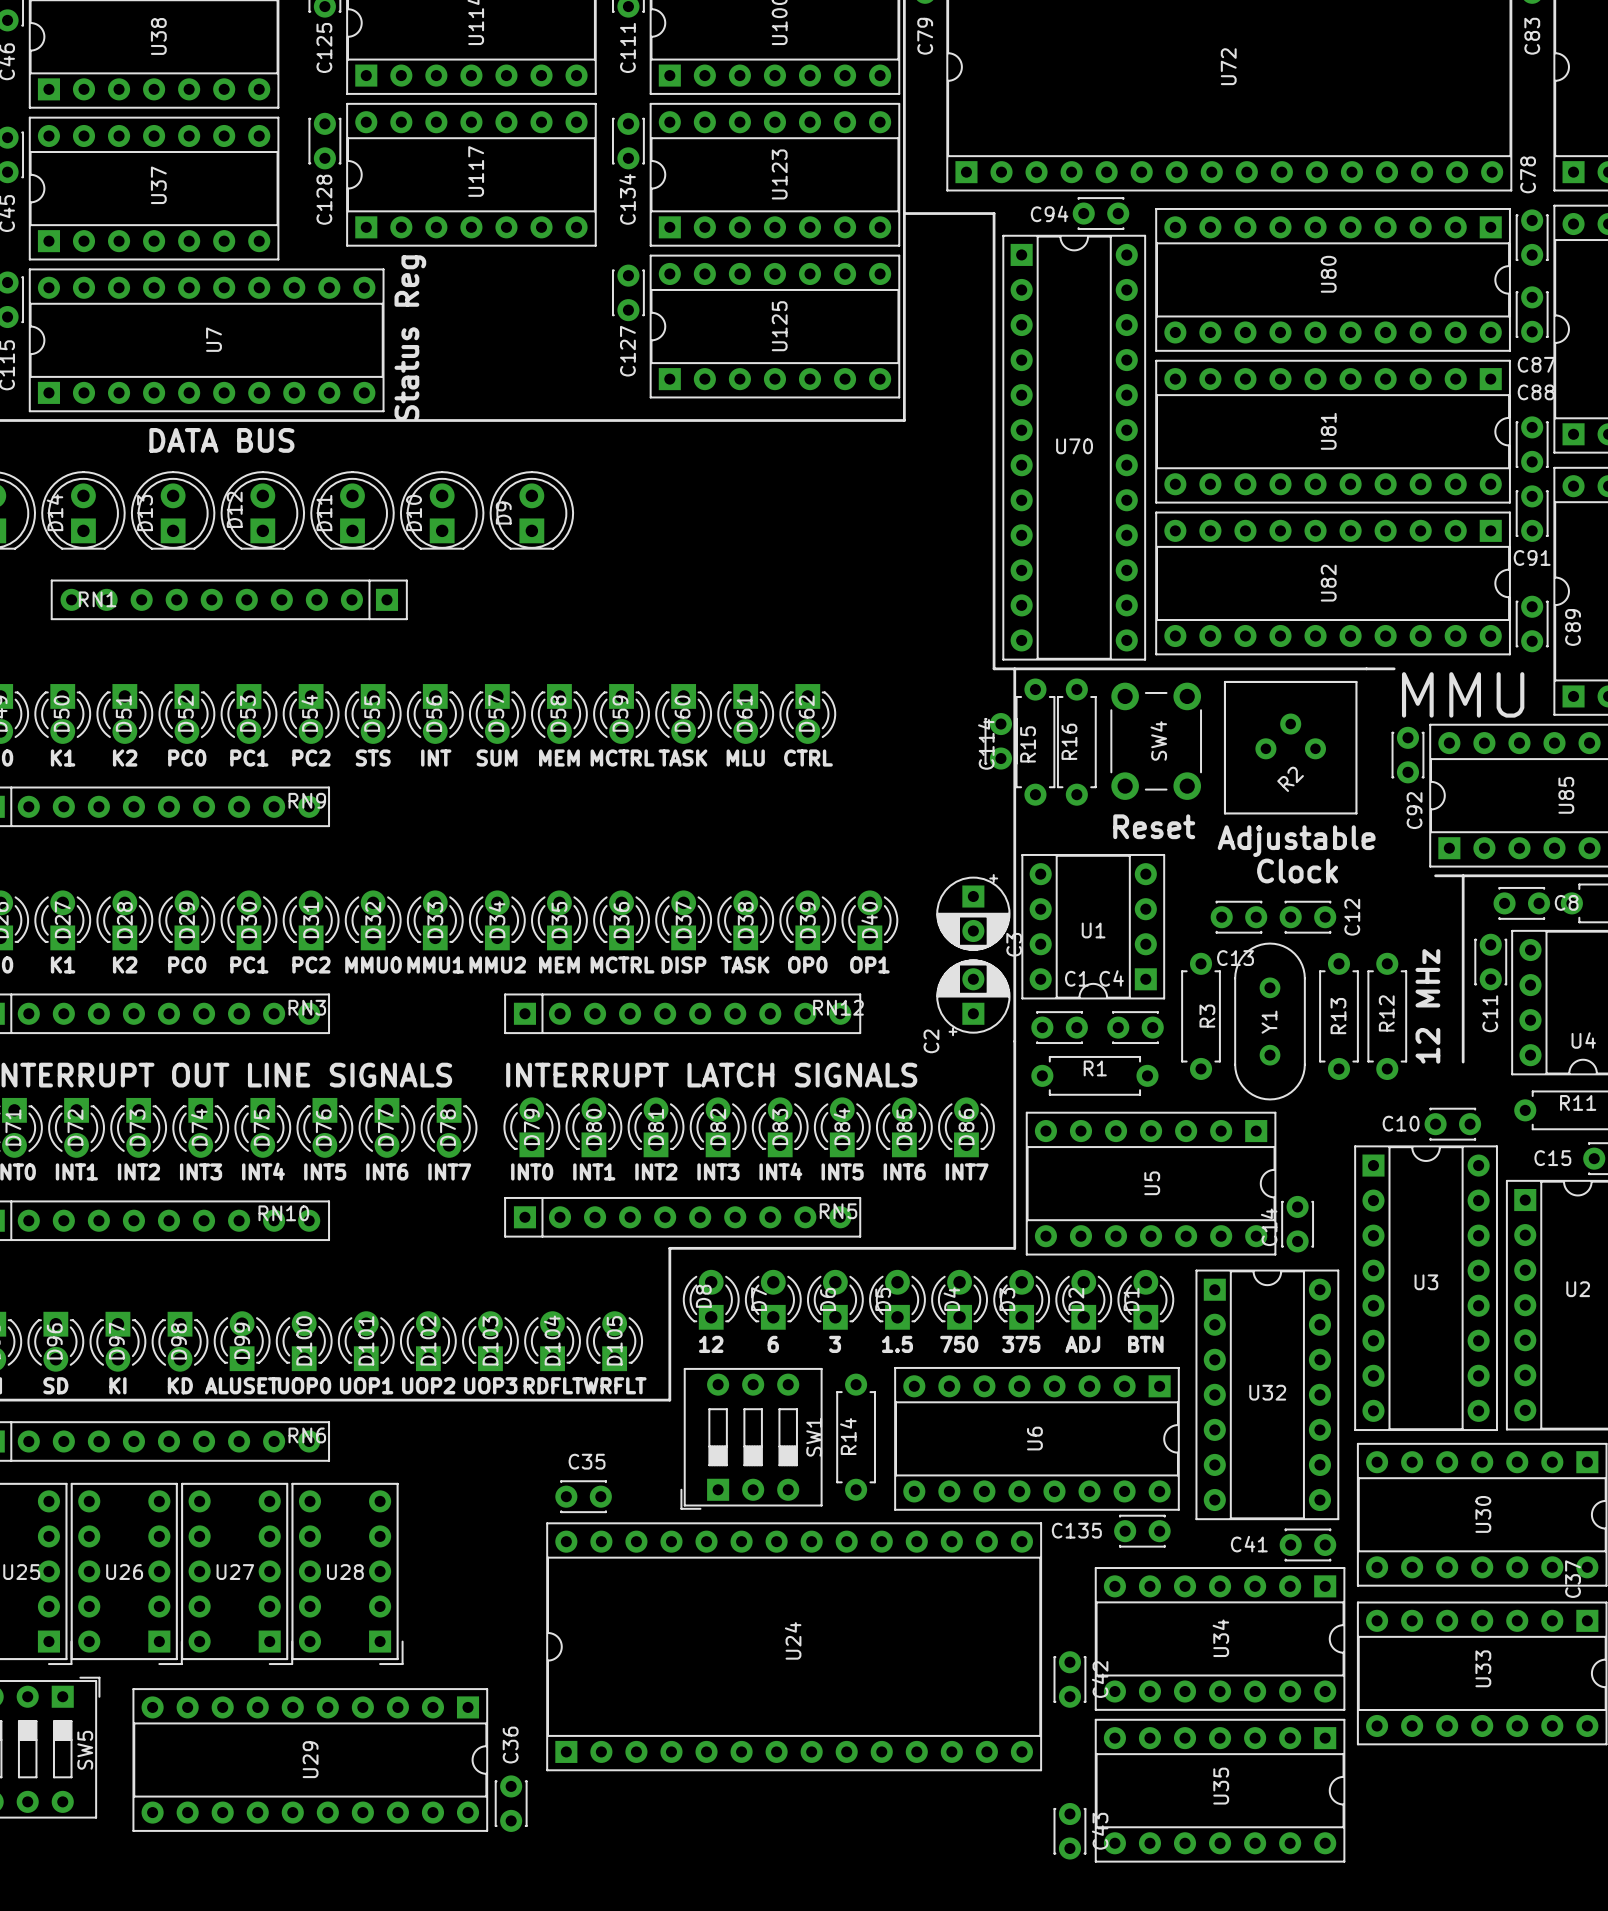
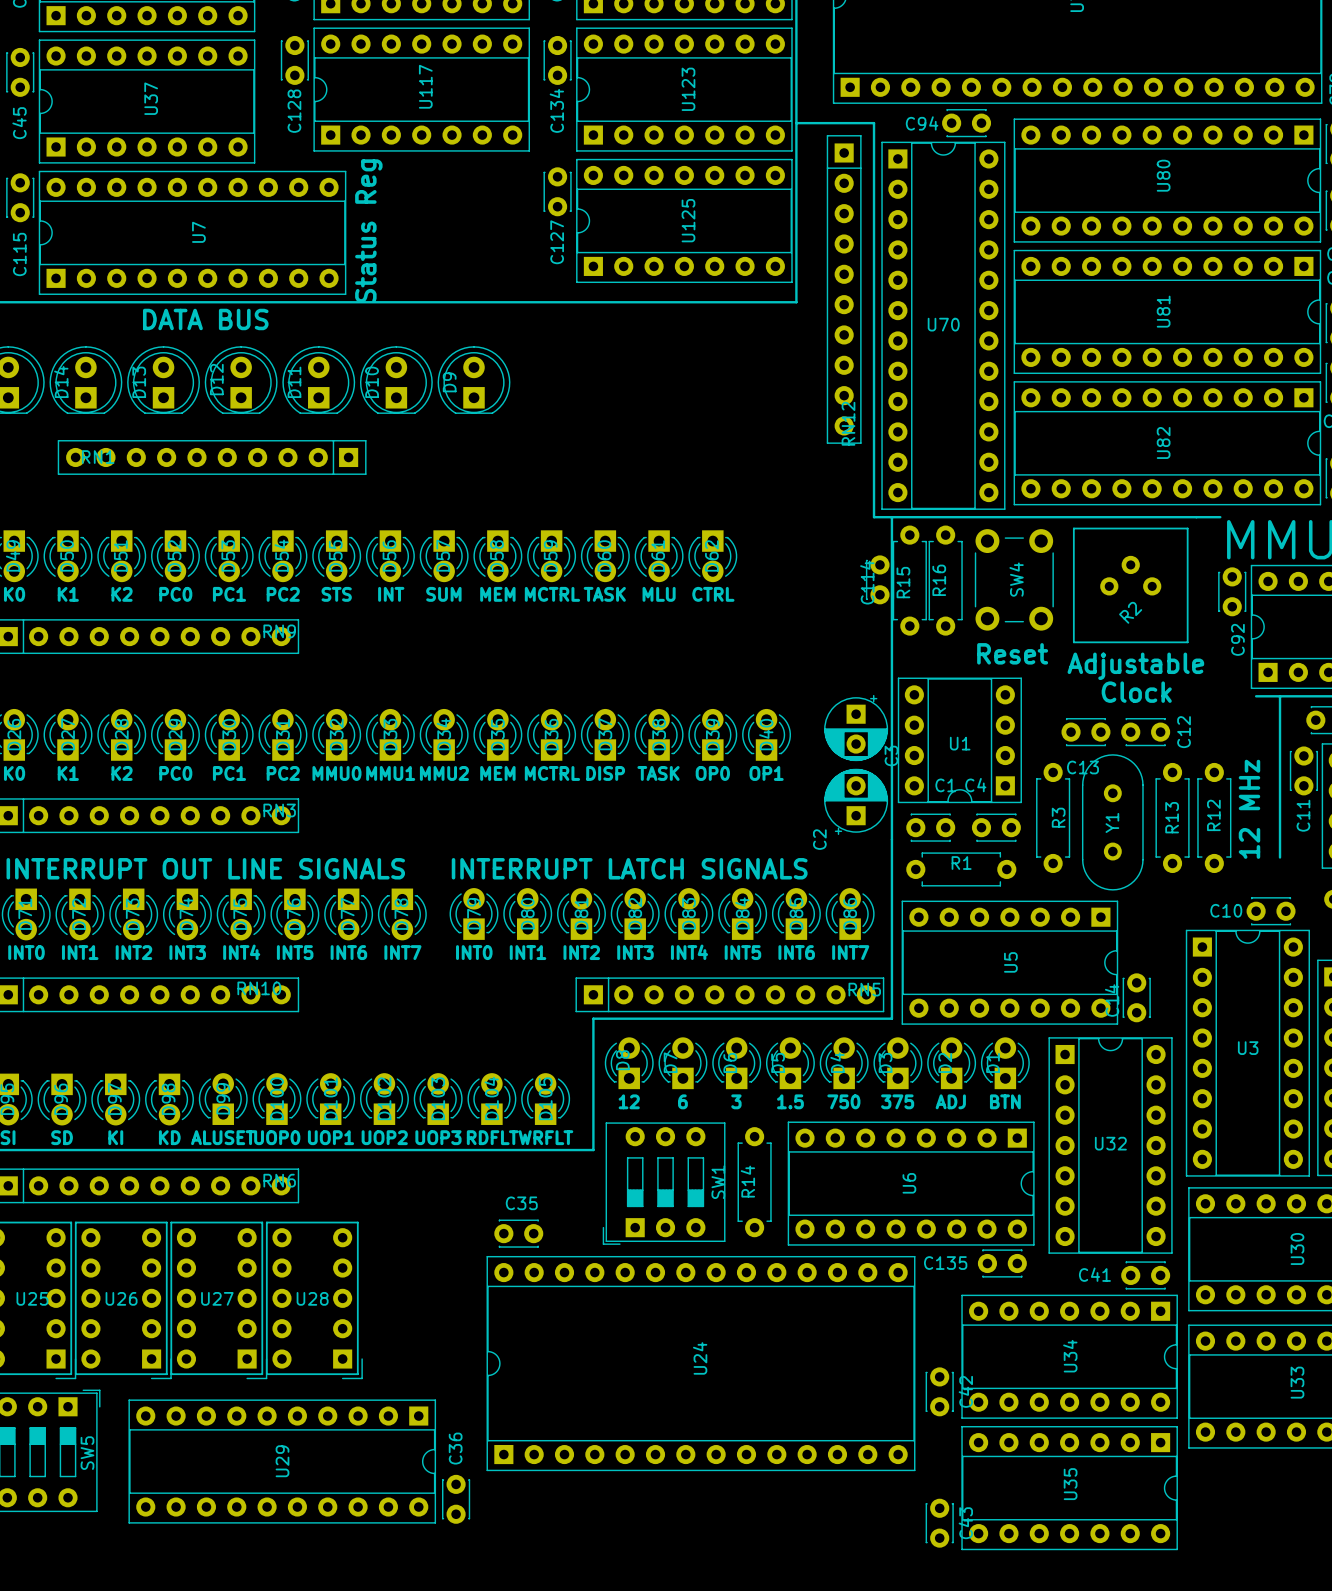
RN12 rotation: 0° (682, 1013) -> 90° clockwise (844, 289)
RN12 position: (682, 1013) -> (844, 289)
RN5 position: (682, 1217) -> (729, 994)

